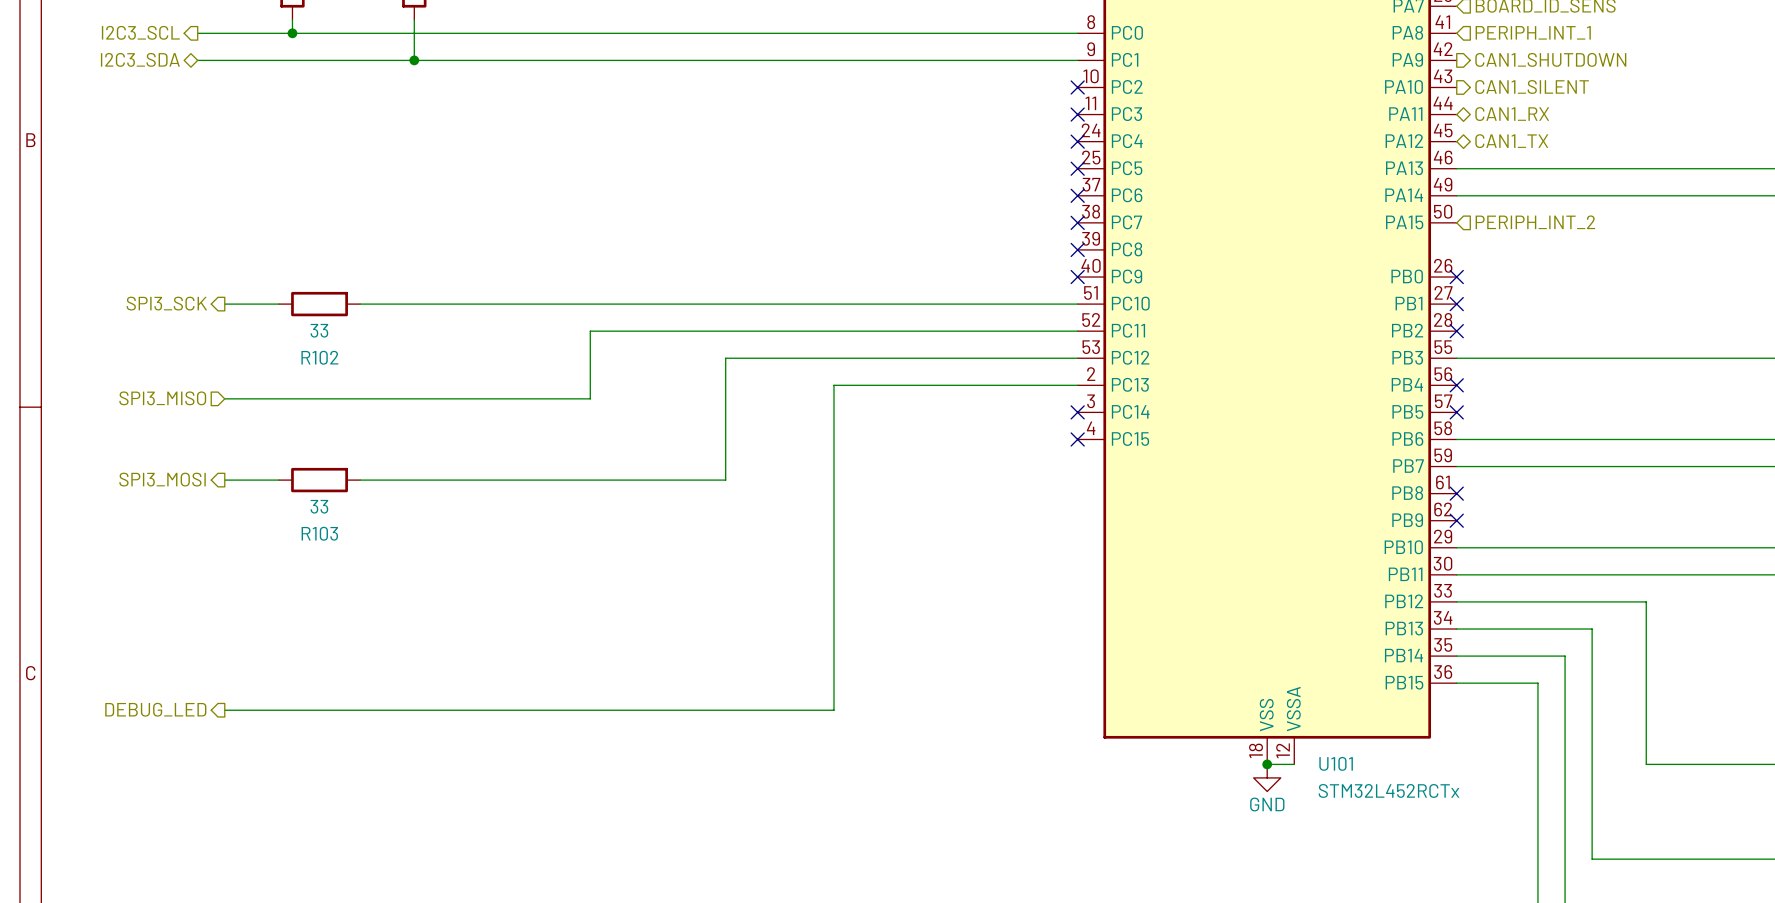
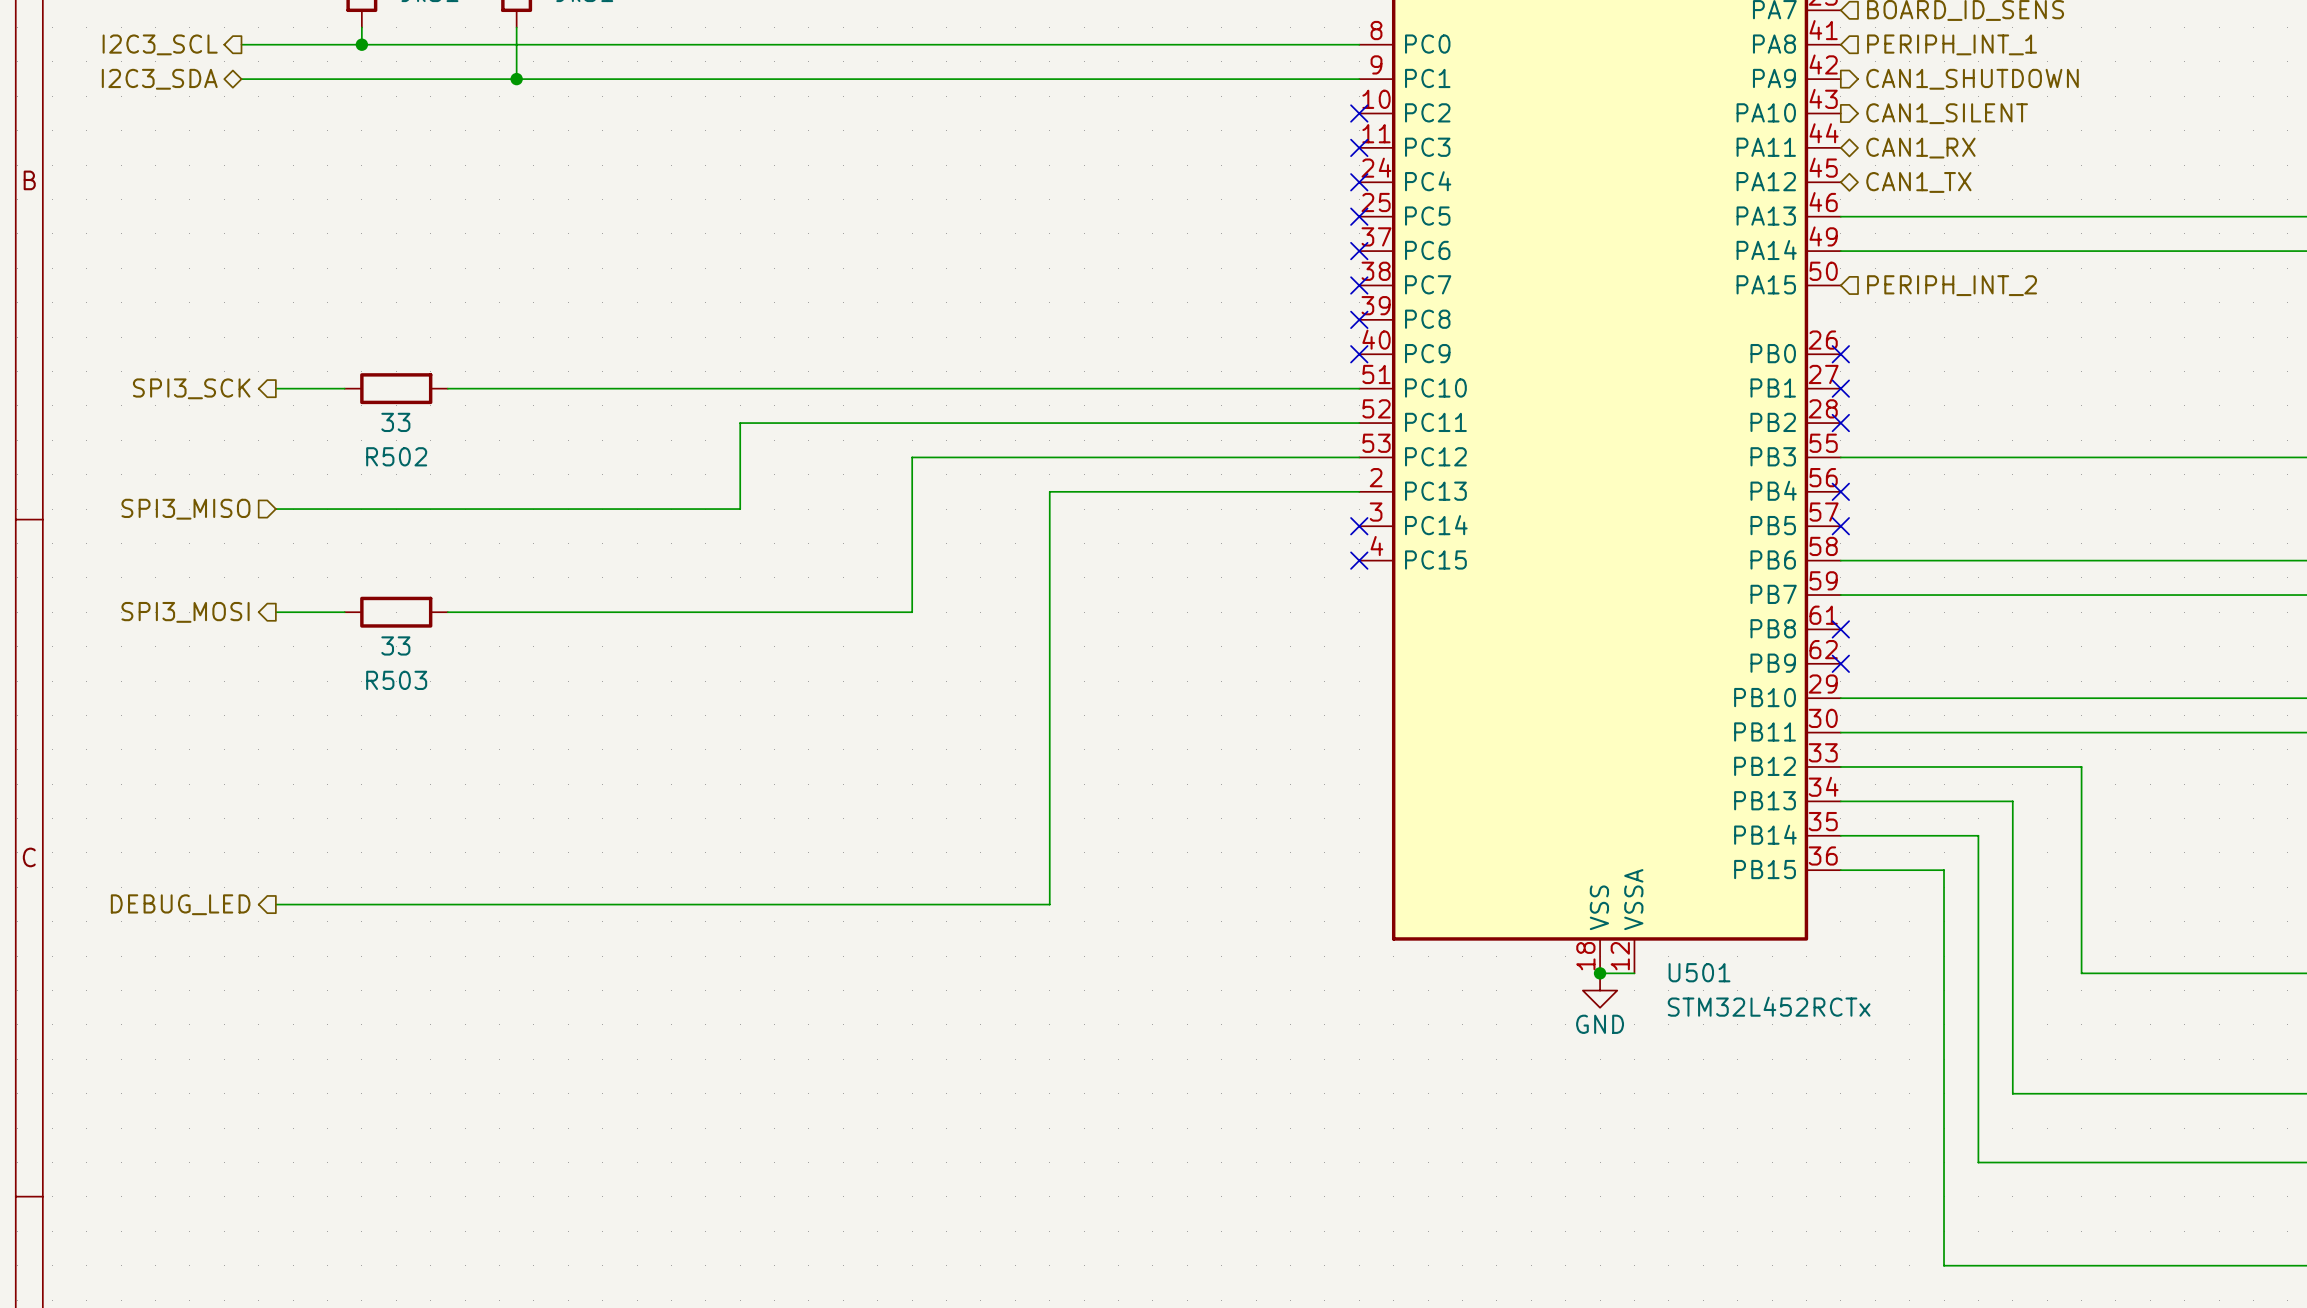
R102 name: R102 (319, 357) -> R502 (396, 456)
R103 name: R103 (319, 533) -> R503 (396, 680)
U101 name: U101 (1336, 763) -> U501 (1699, 972)

